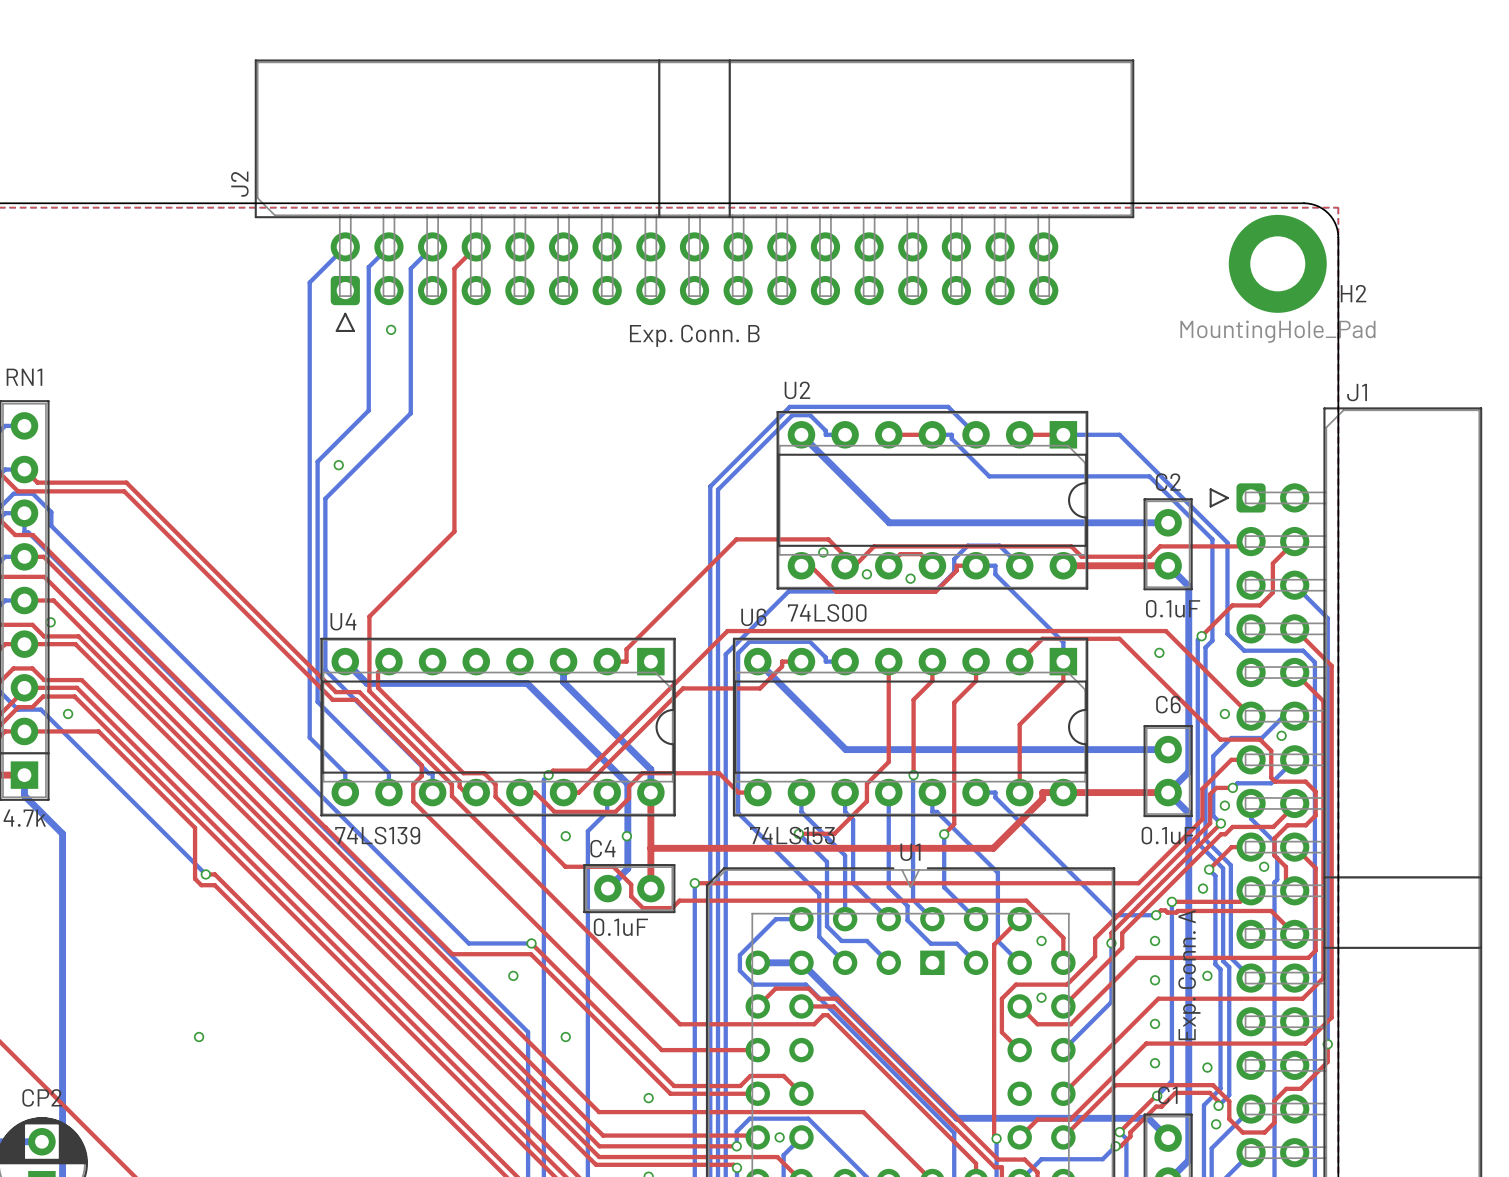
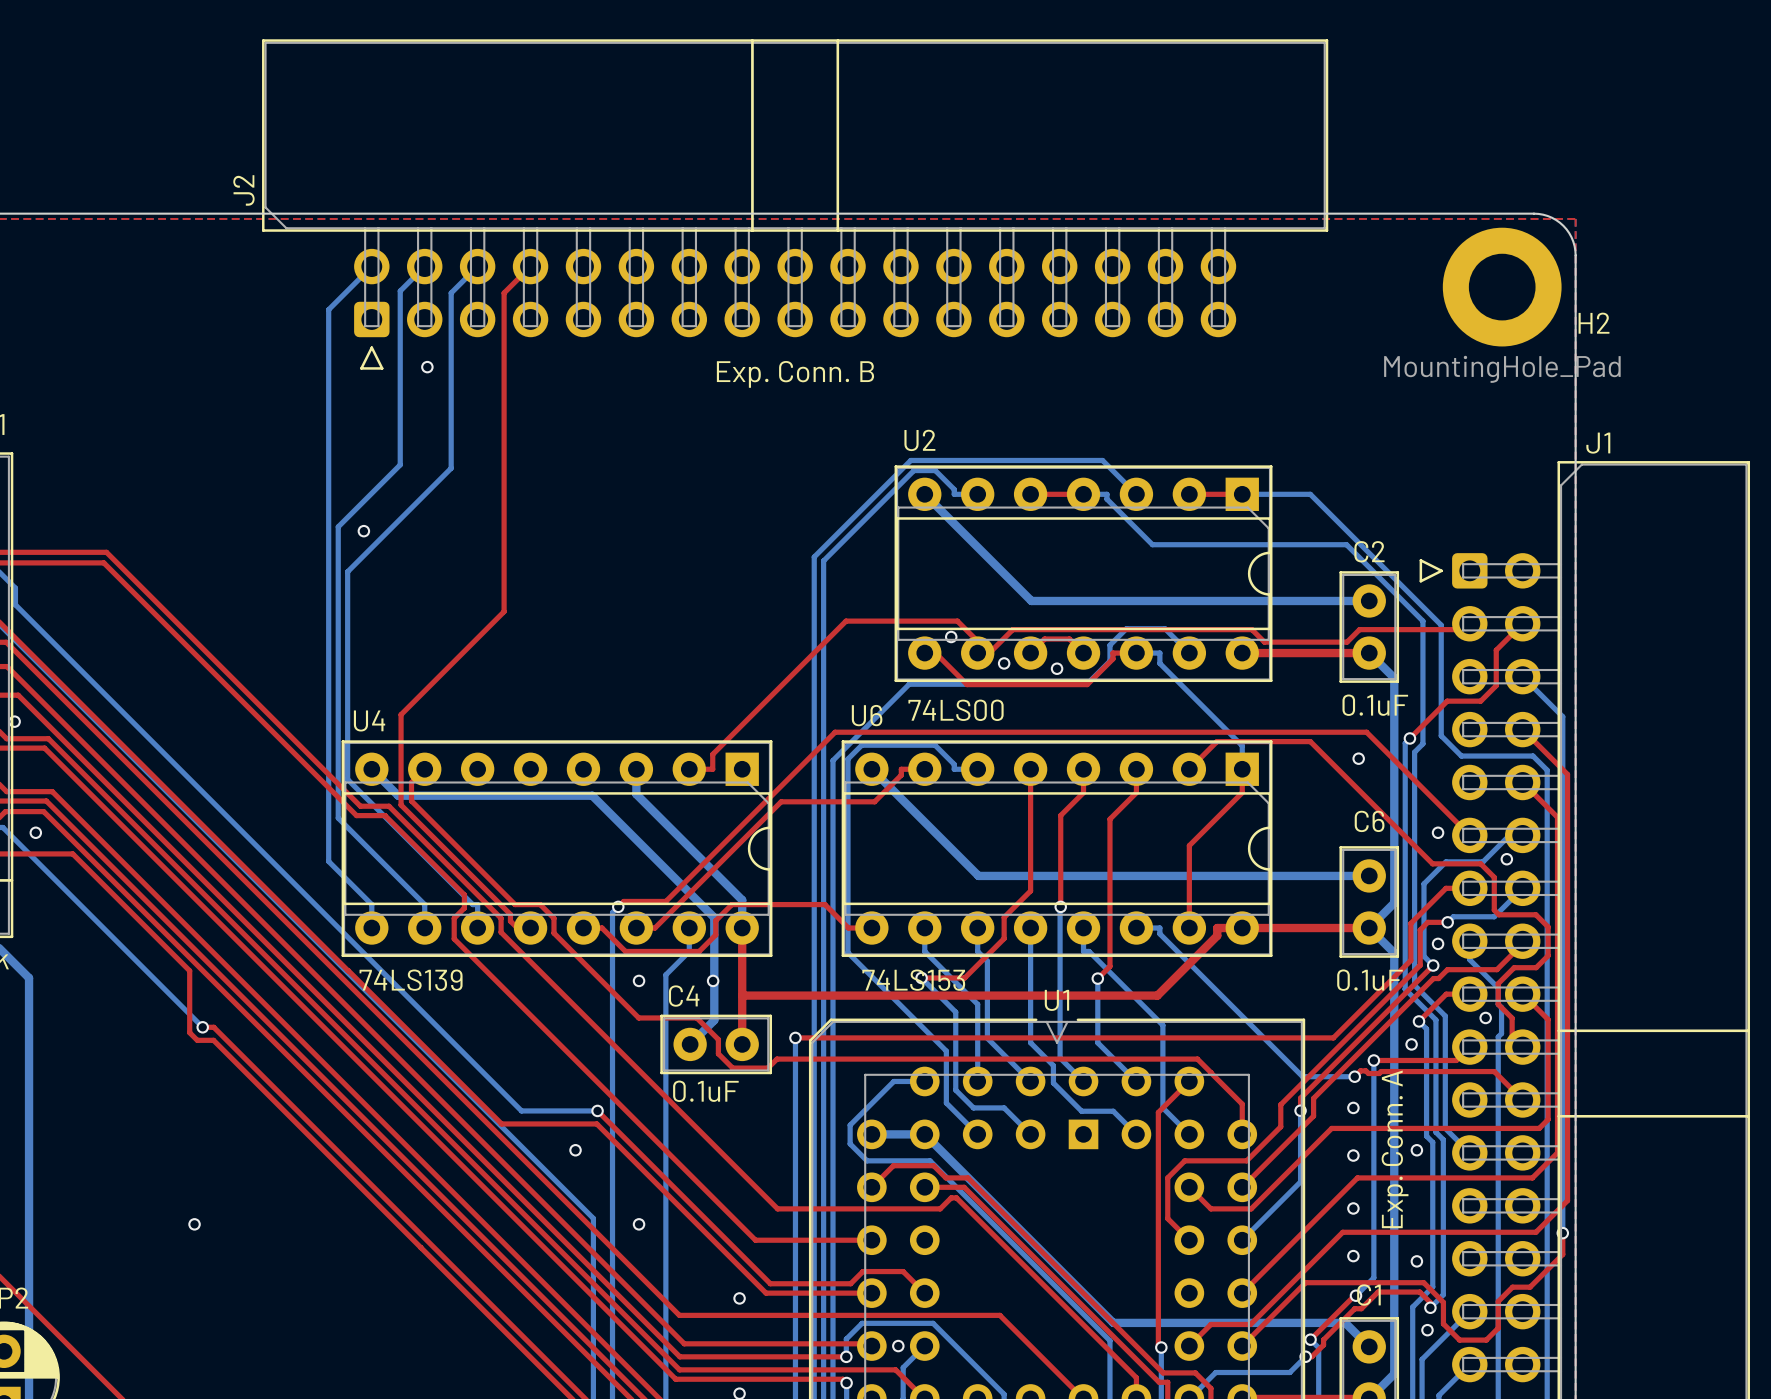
via: (1041, 940) -> none
via: (1041, 997) -> none

